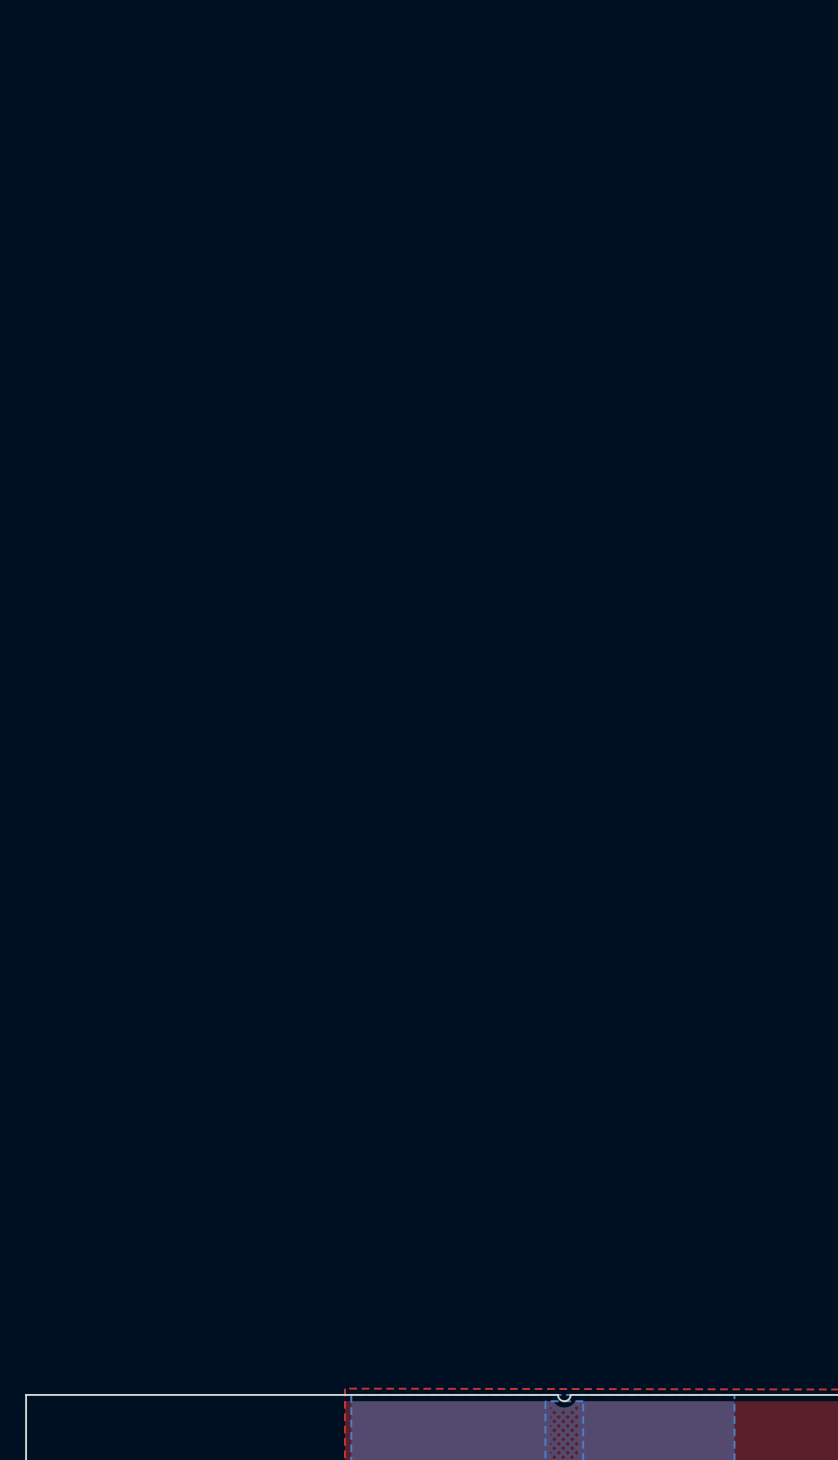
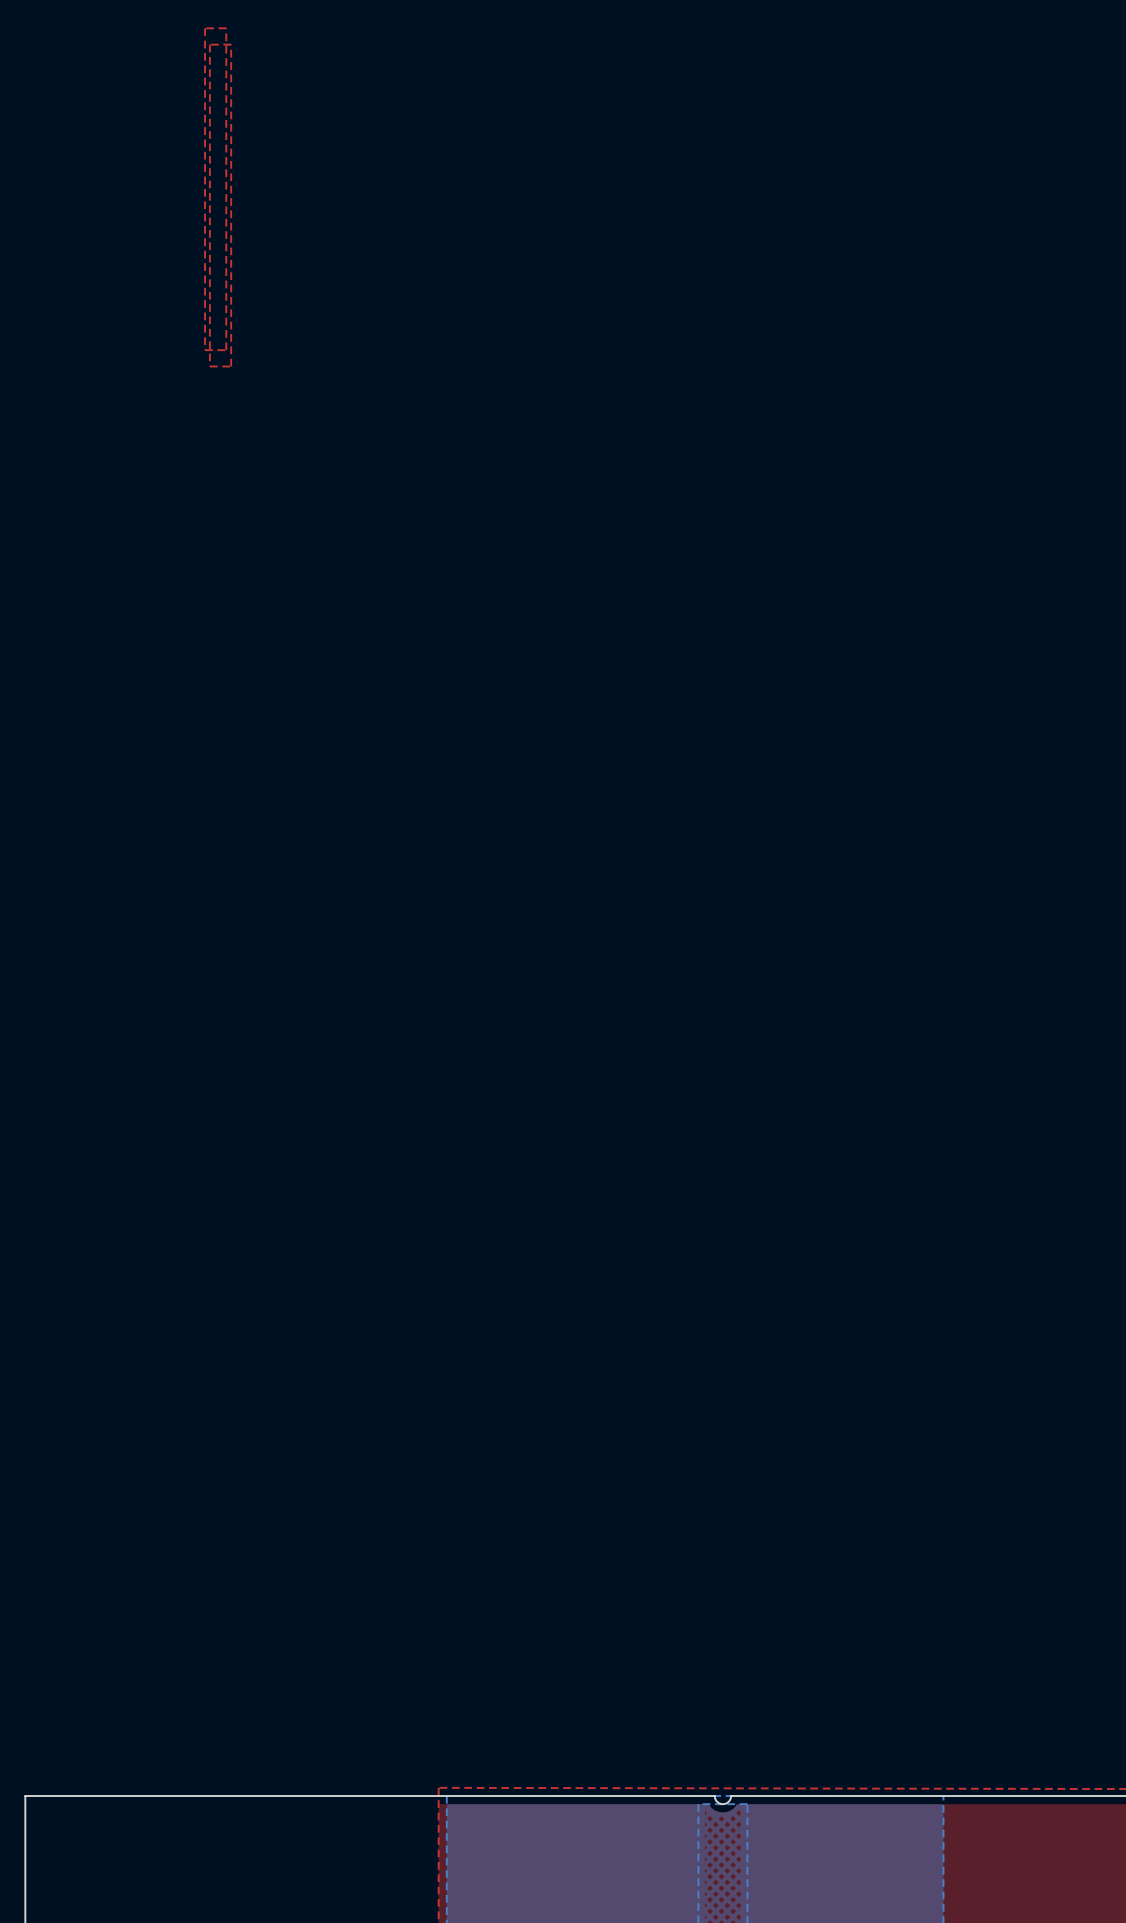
top zone outline: none -> (226, 28) (226, 350) (205, 350) (205, 28) (226, 28)
top zone outline: none -> (231, 44) (231, 366) (209, 366) (209, 44) (231, 44)

